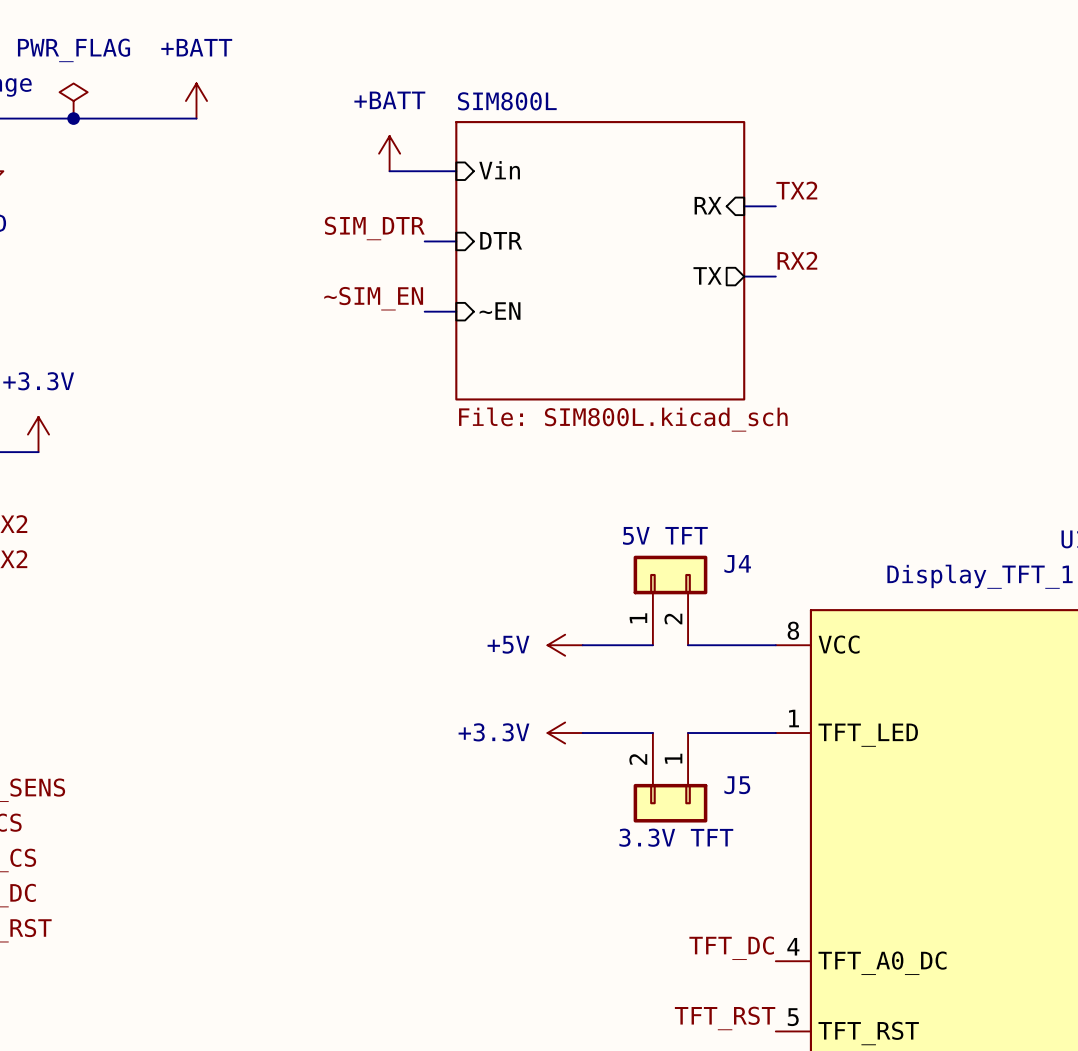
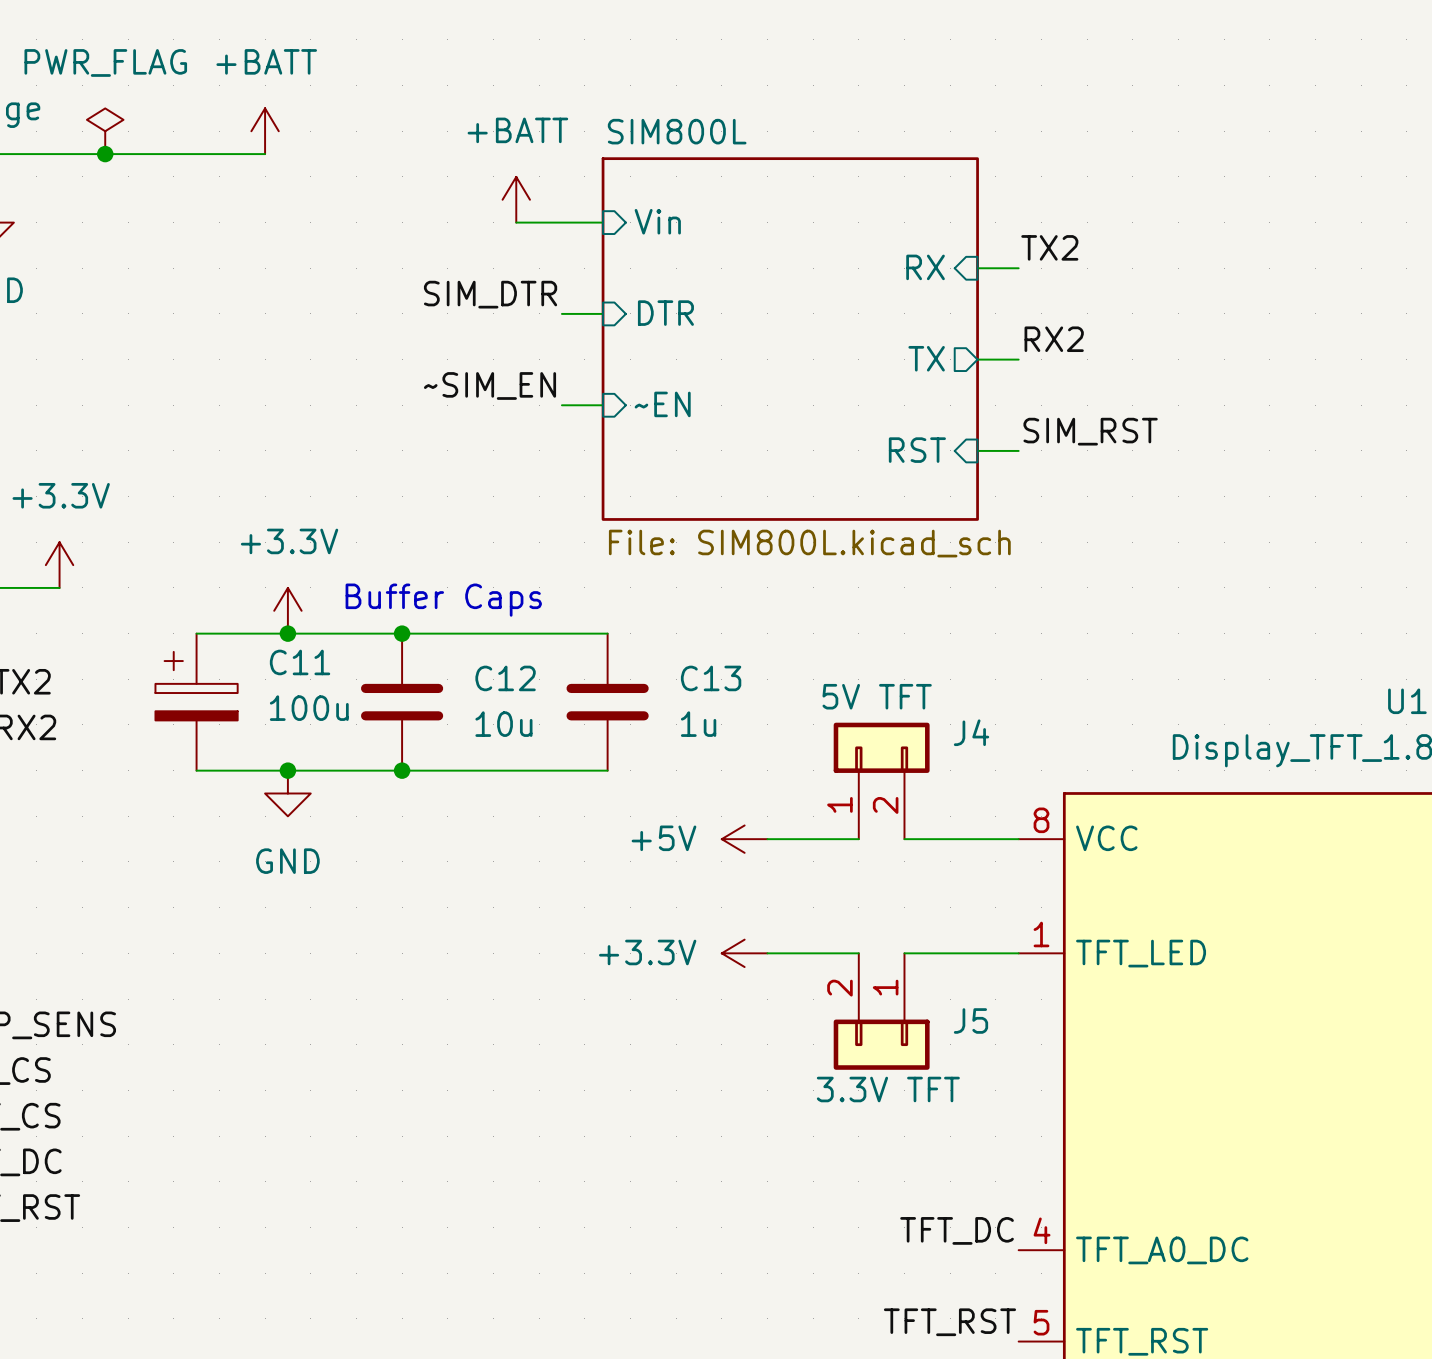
label: none -> SIM_RST (1090, 431)
sheet pin: none -> RST (917, 450)
wire: none -> (977, 450) (1018, 450)
text: none -> Buffer Caps (443, 600)
power symbol: none -> +3.3V (287, 610)
wire: none -> (196, 633) (607, 633)
junction: none -> (287, 633)
junction: none -> (402, 633)
C11: none -> 100u (196, 702)
C12: none -> 10u (402, 702)
C13: none -> 1u (607, 702)
wire: none -> (196, 770) (607, 770)
junction: none -> (287, 770)
junction: none -> (402, 770)
power symbol: none -> GND (287, 793)

